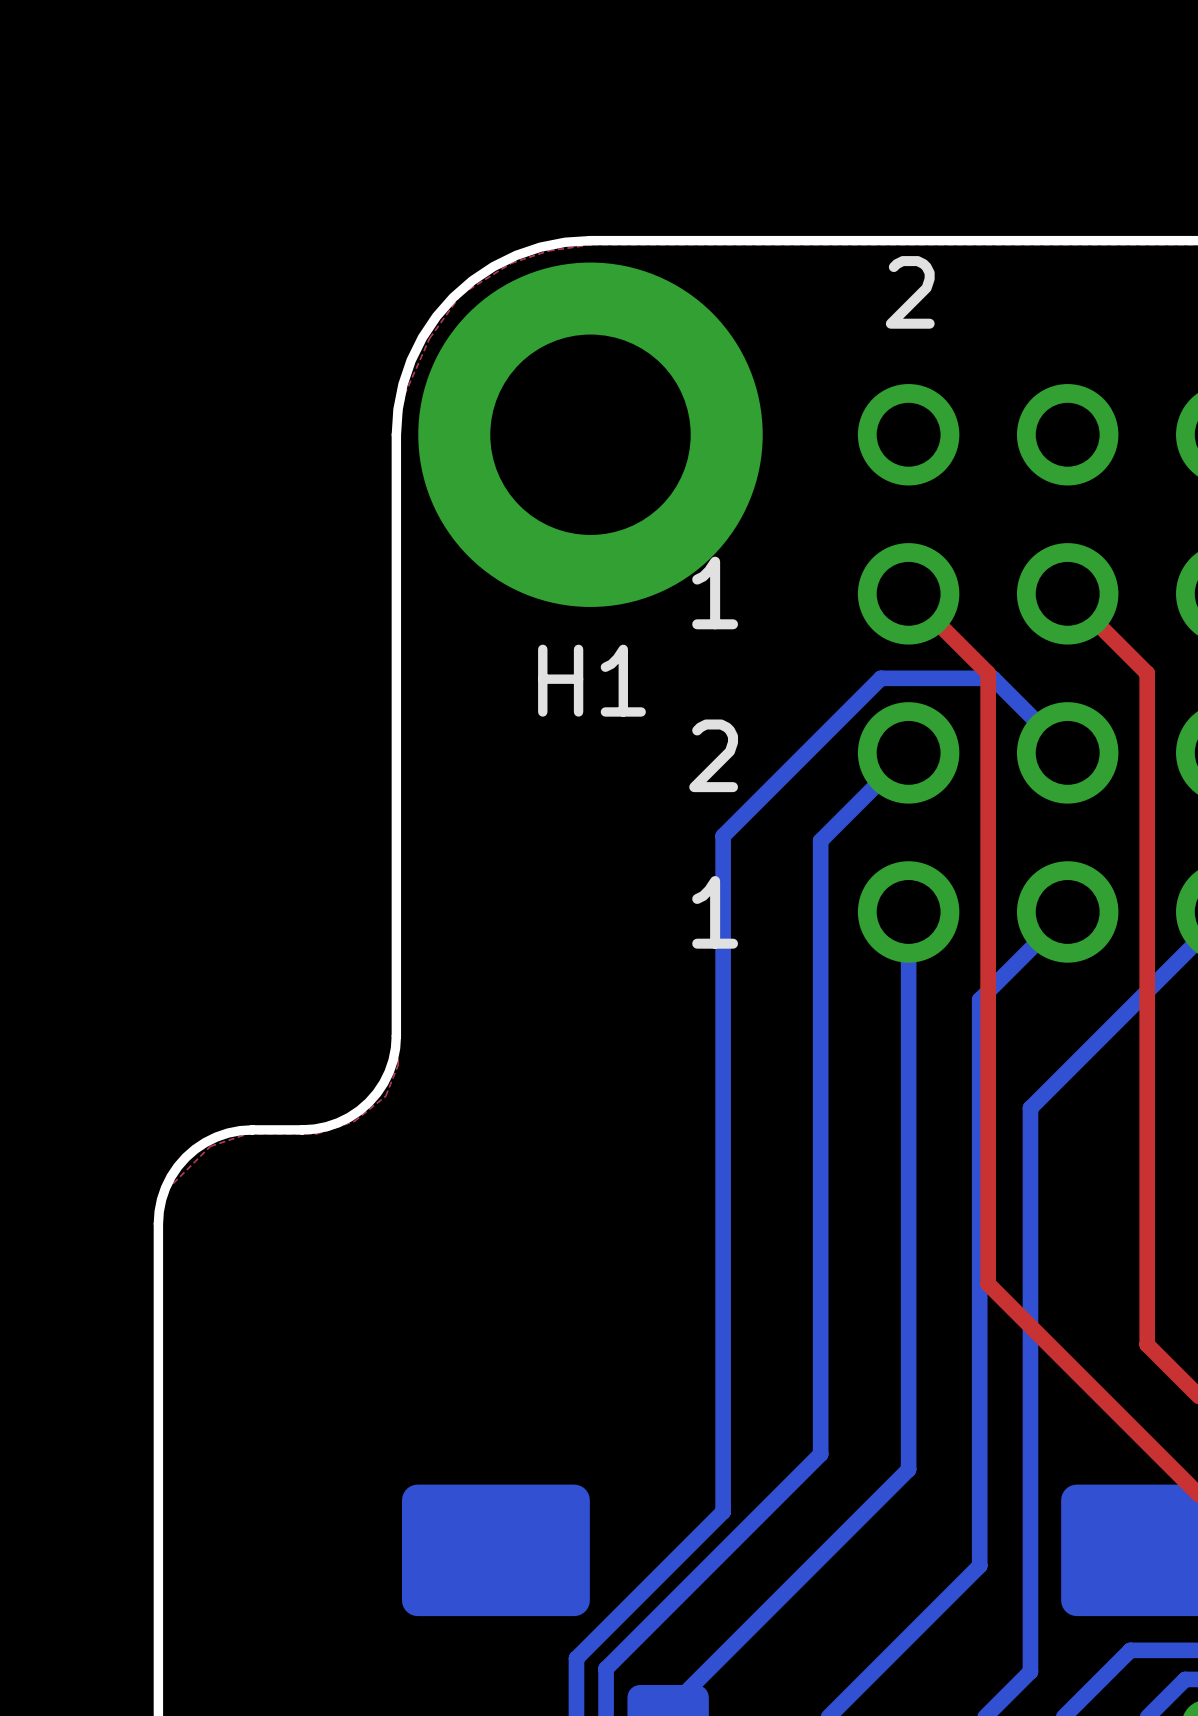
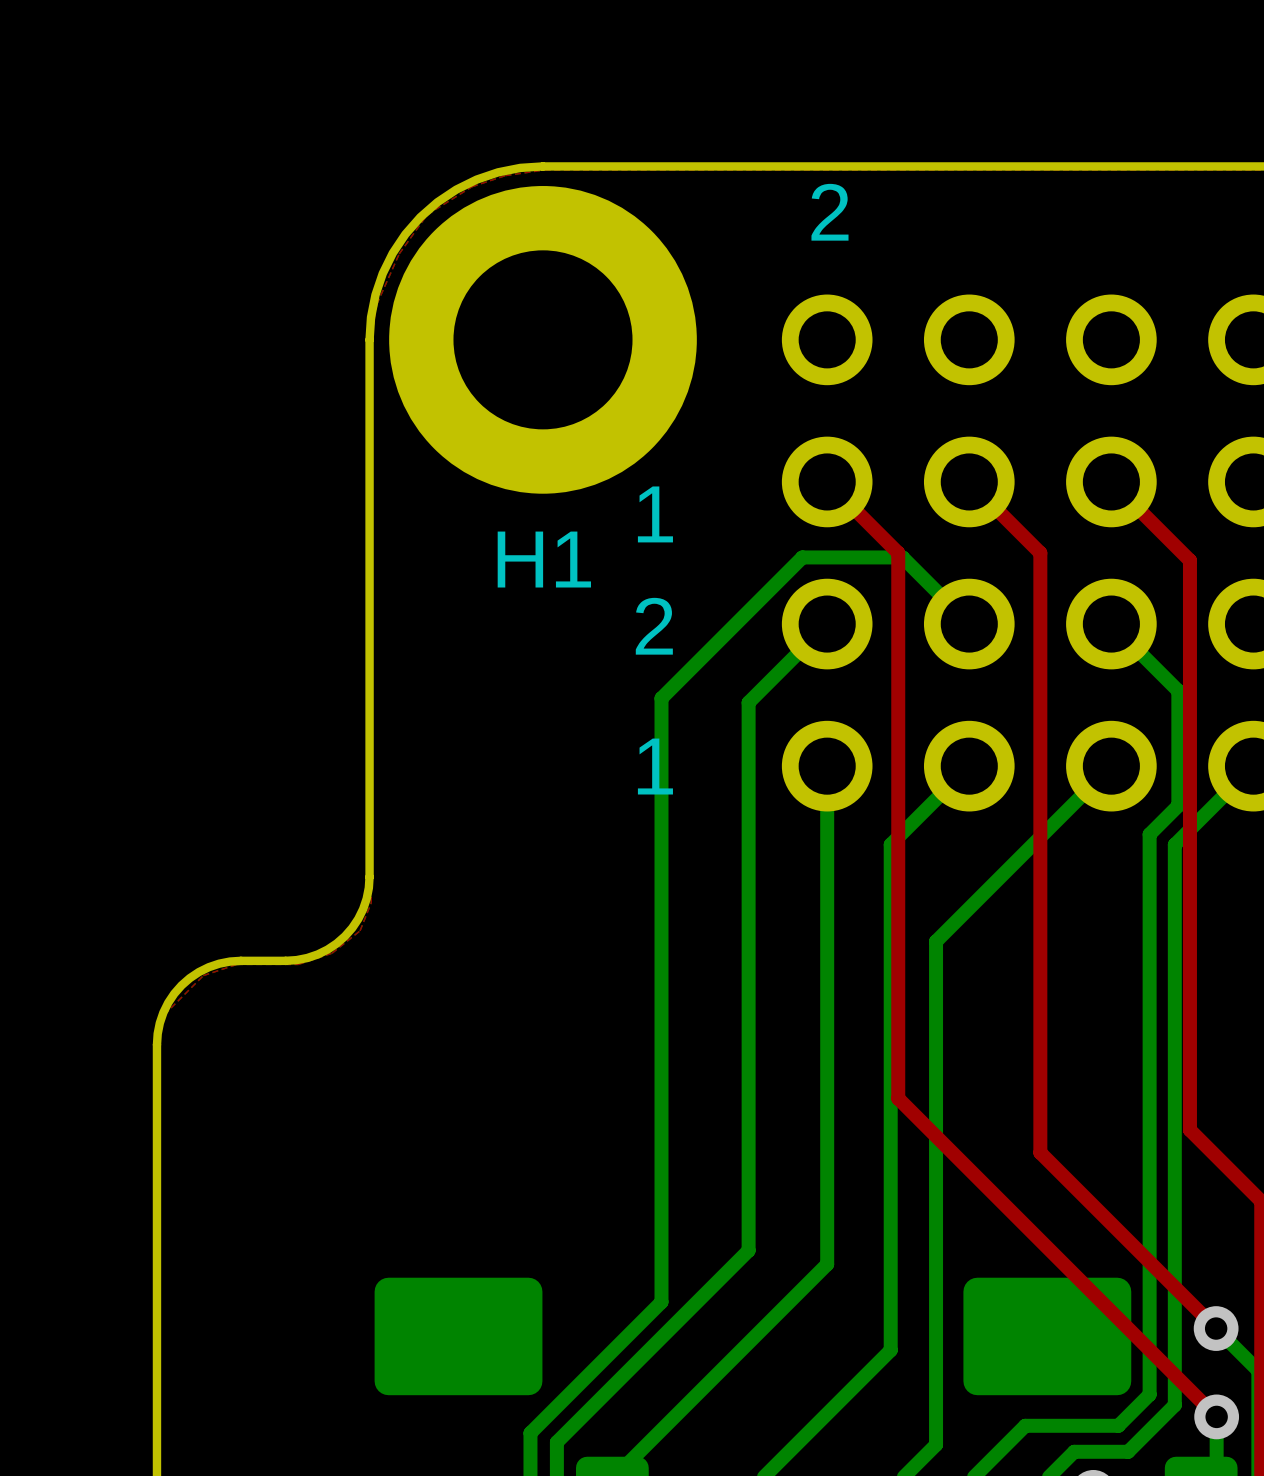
part text position: 1 (715, 592) -> 1 (655, 514)

